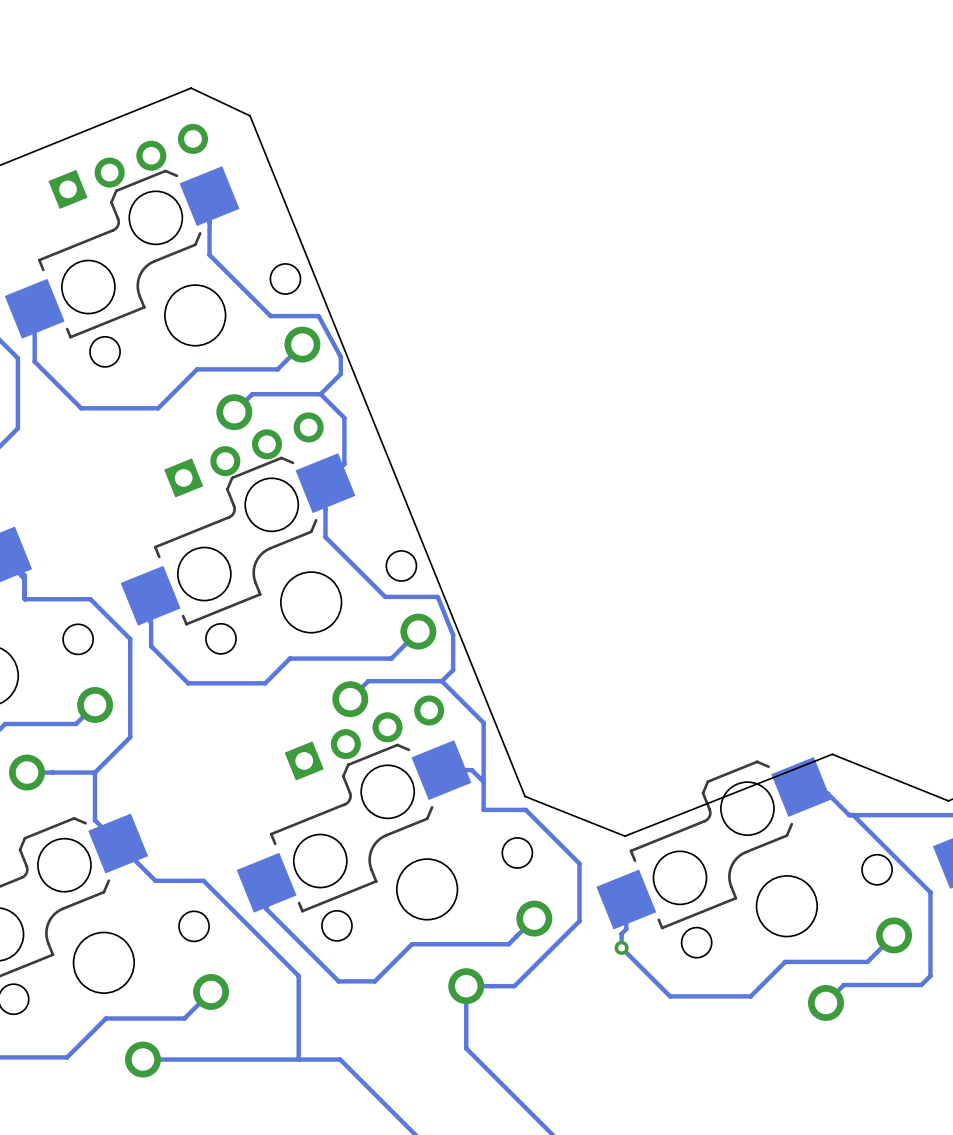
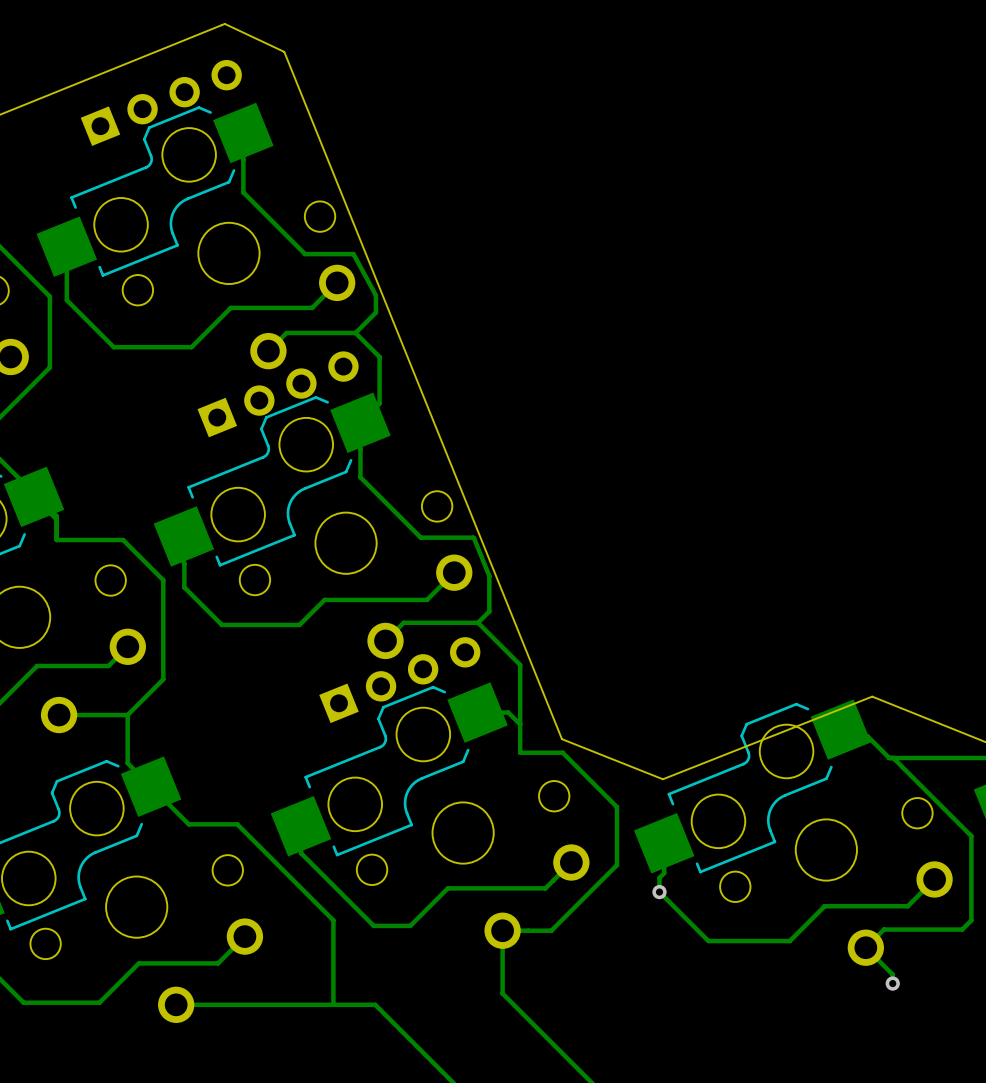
track: none -> (865, 947) (892, 974) (892, 983)
via: none -> (892, 983)

